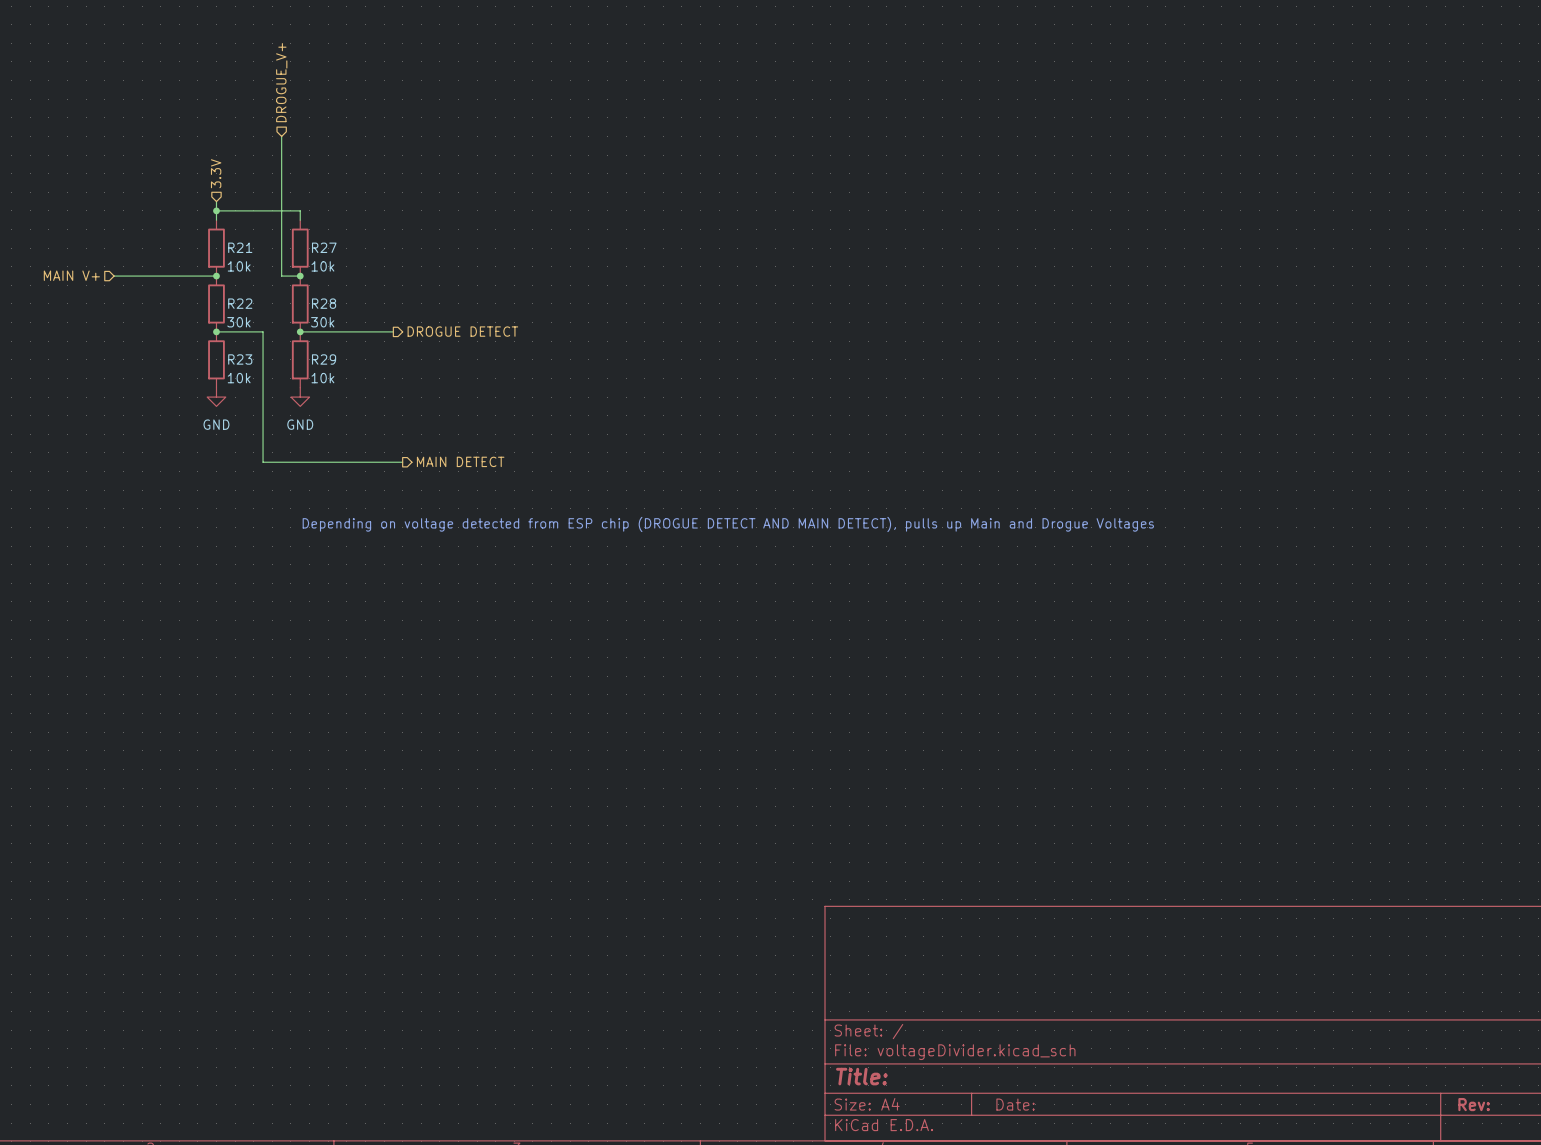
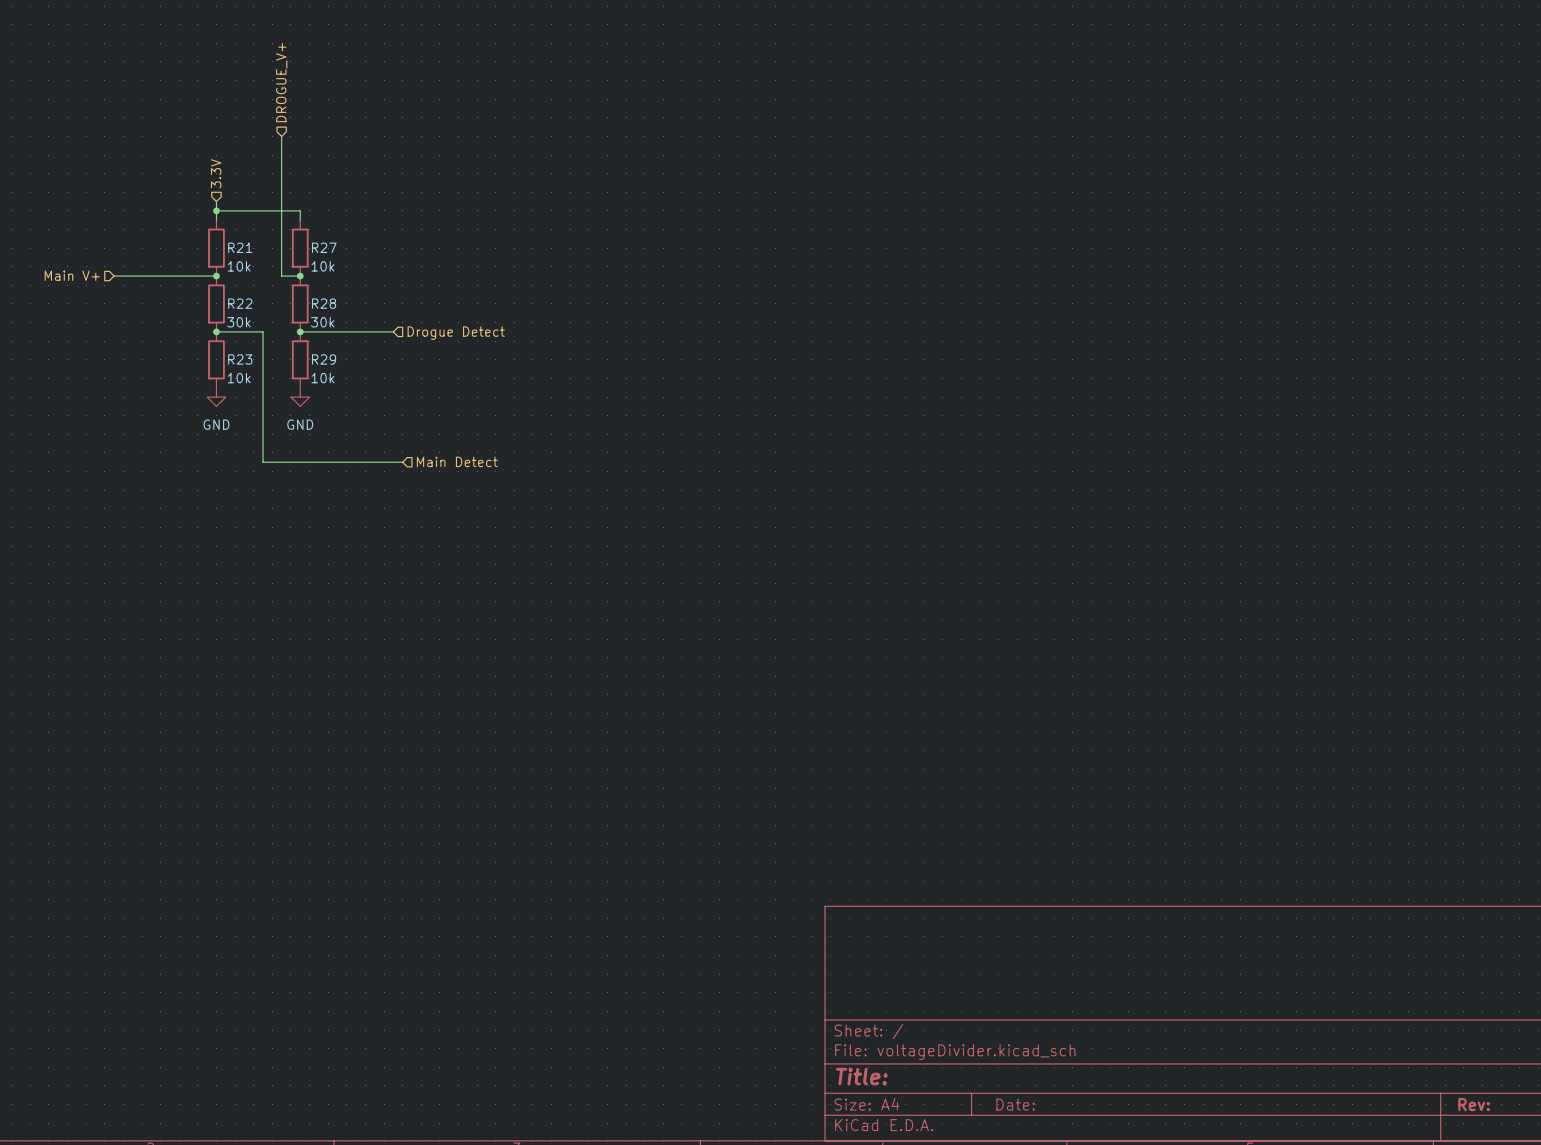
hierarchical label: MAIN V+ (71, 275) -> Main V+ (72, 275)
hierarchical label shape: output (462, 331) -> input (456, 333)
hierarchical label: DROGUE DETECT (462, 331) -> Drogue Detect (456, 333)
hierarchical label shape: output (460, 461) -> input (457, 461)
hierarchical label: MAIN DETECT (460, 461) -> Main Detect (457, 461)
text: Depending on voltage detected from ESP chip (DROGUE DETECT AND MAIN DETECT), pulls up Main and Drogue Voltages (728, 524) -> none

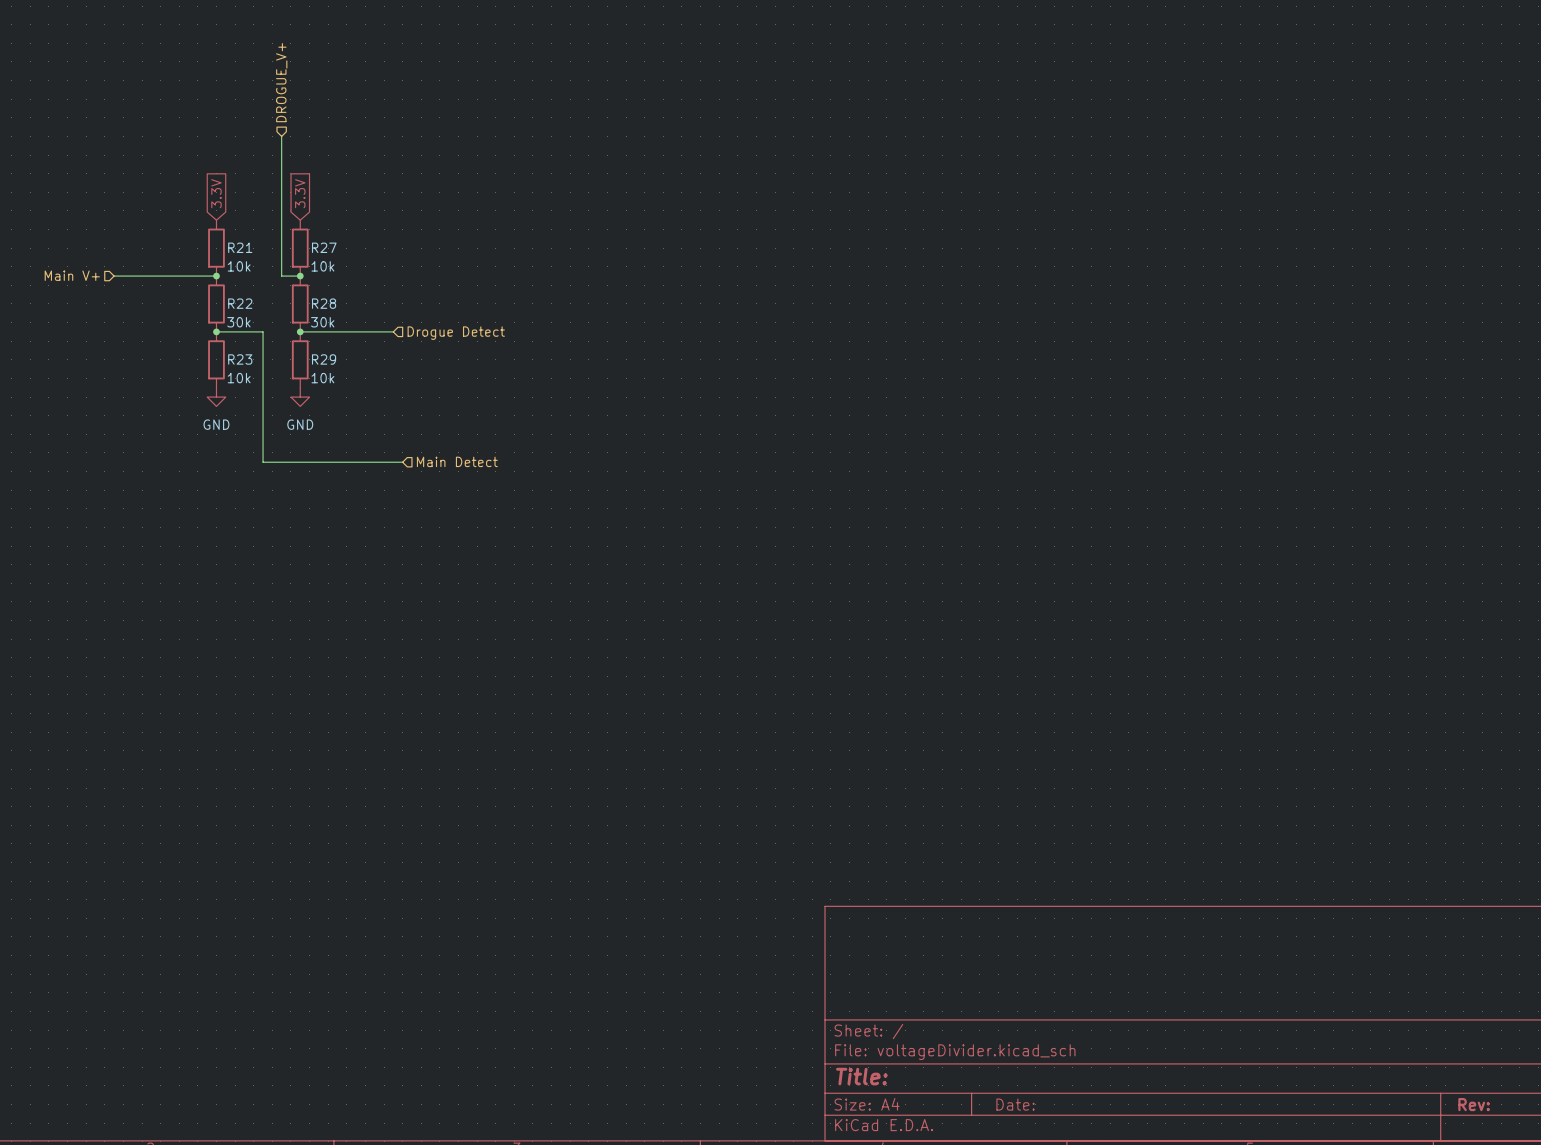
hierarchical label: 3.3V (216, 173) -> none
global label: none -> 3.3V (216, 193)
global label: none -> 3.3V (300, 193)
wire: (216, 201) (216, 220) -> none
wire: (216, 210) (300, 210) (300, 220) -> none
junction: (216, 210) -> none

